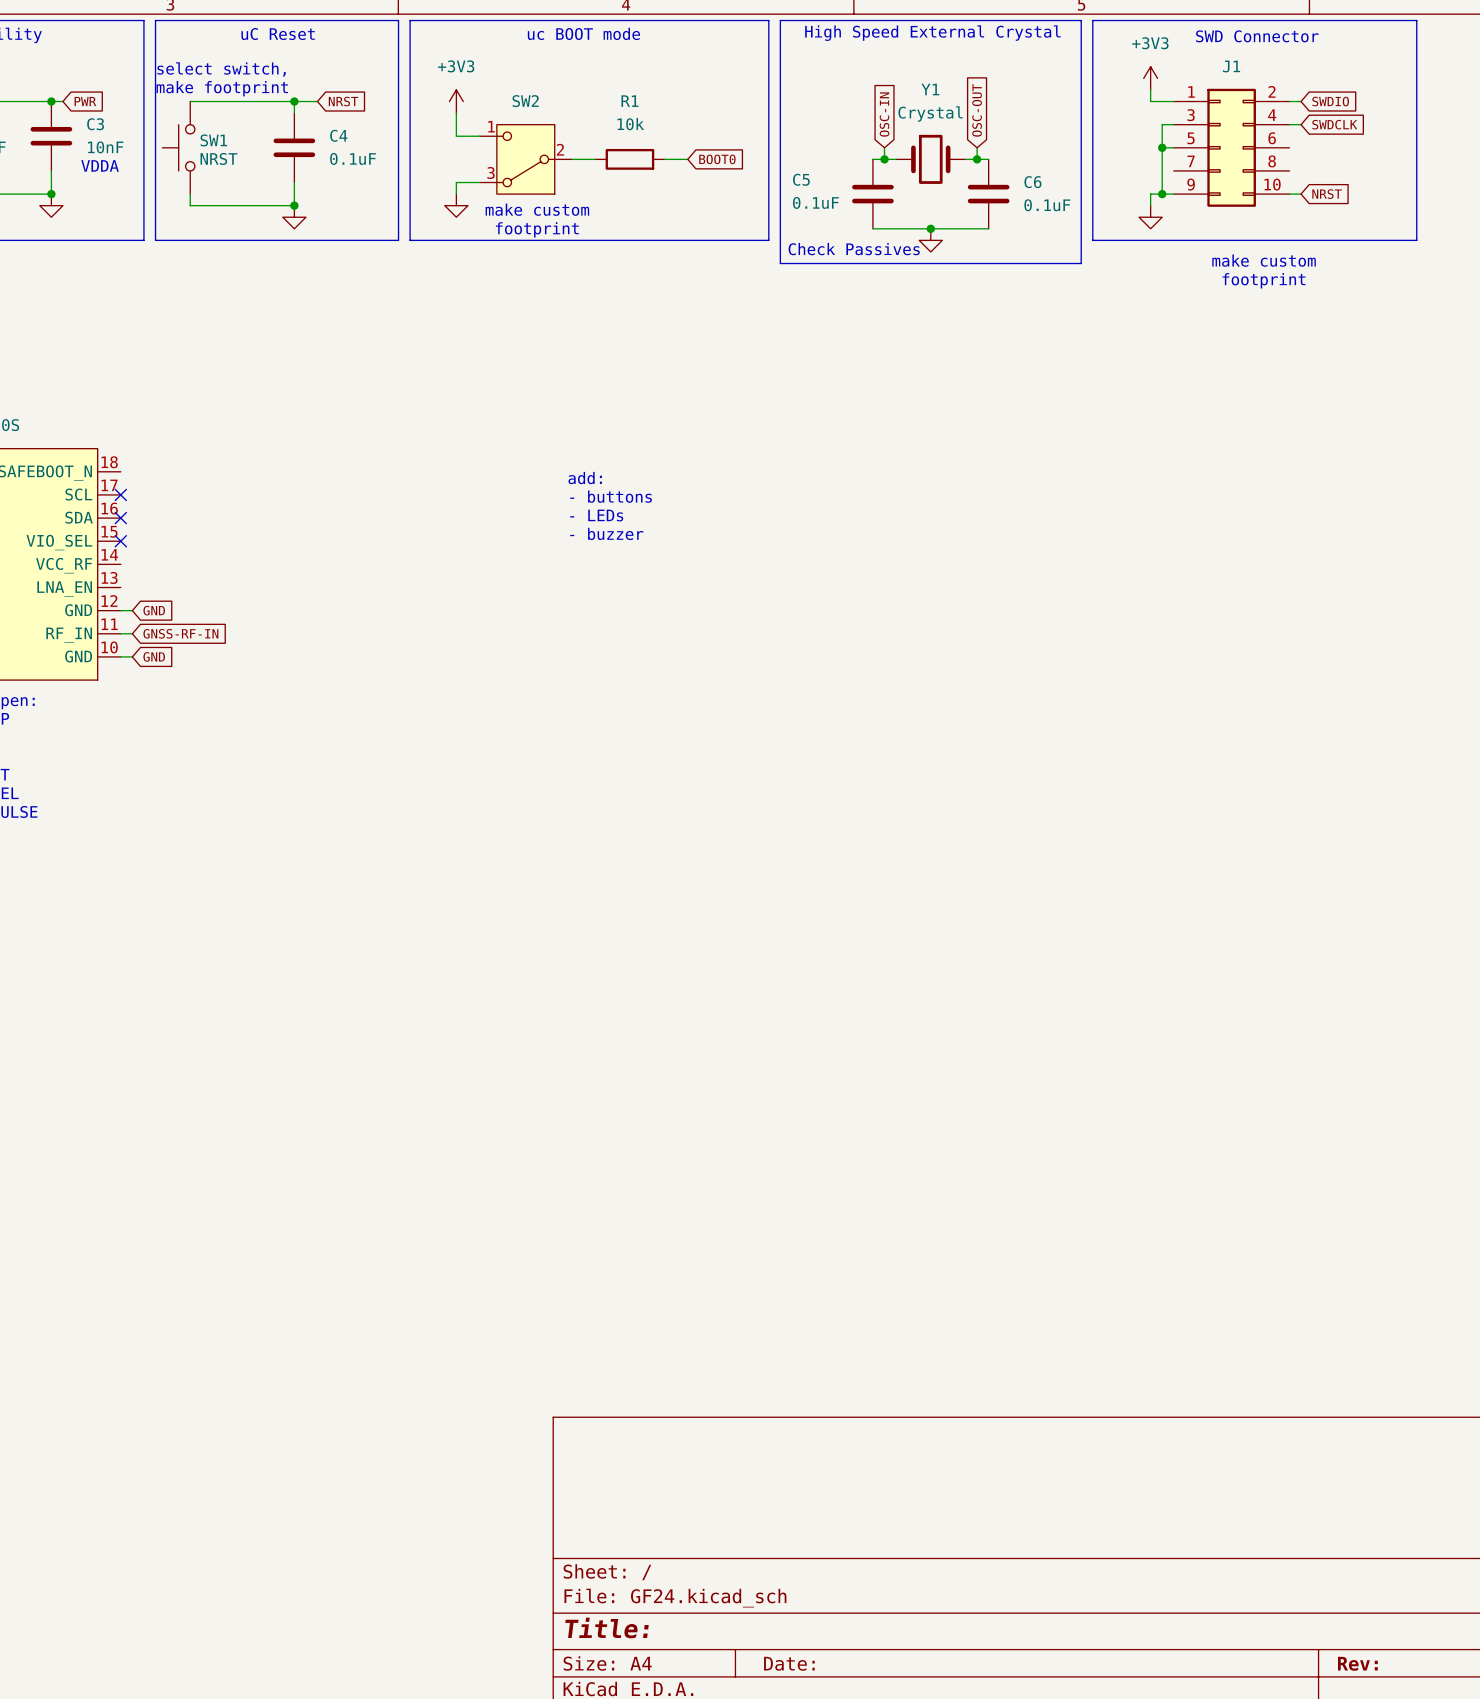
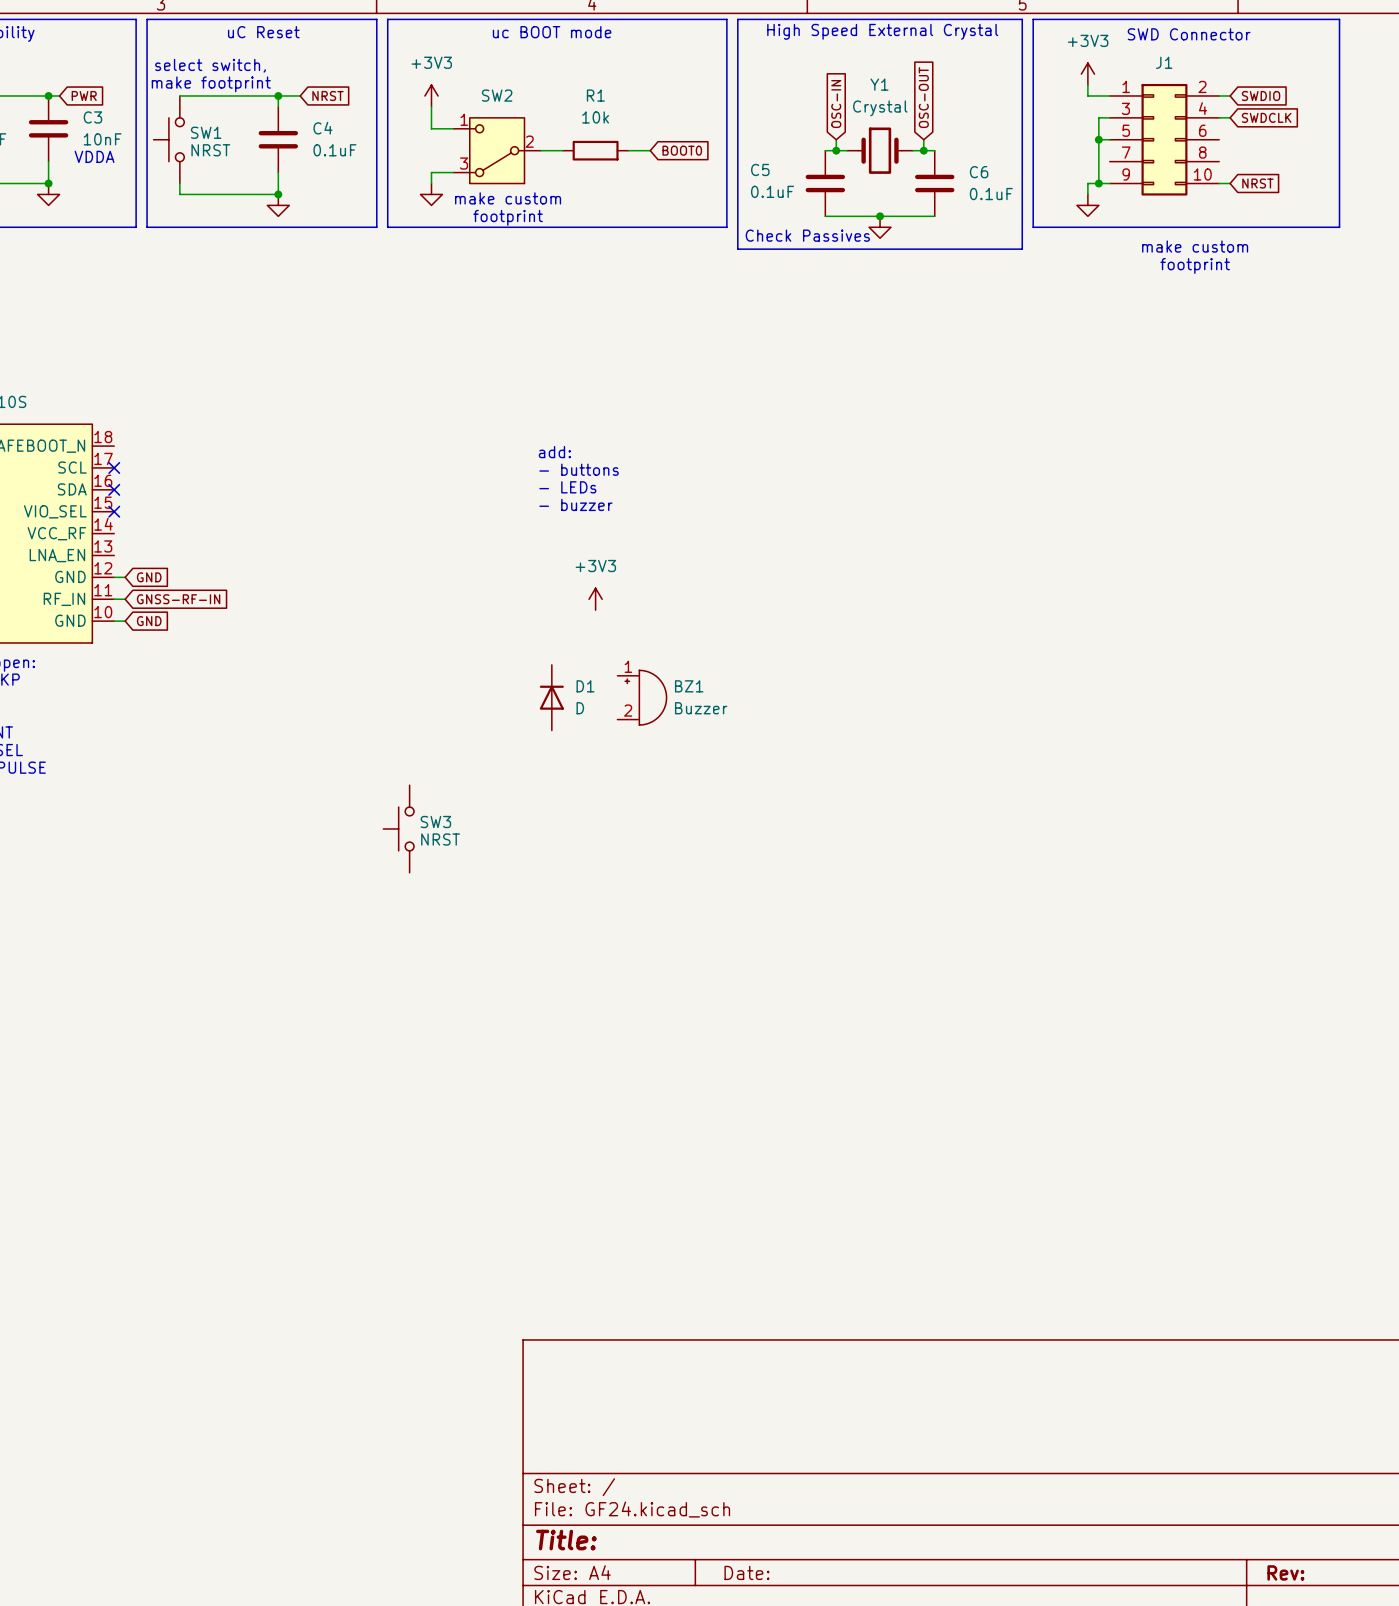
power symbol: none -> +3V3 (595, 599)
D1: none -> D (551, 697)
BZ1: none -> Buzzer (642, 697)
SW3: none -> NRST (398, 828)

